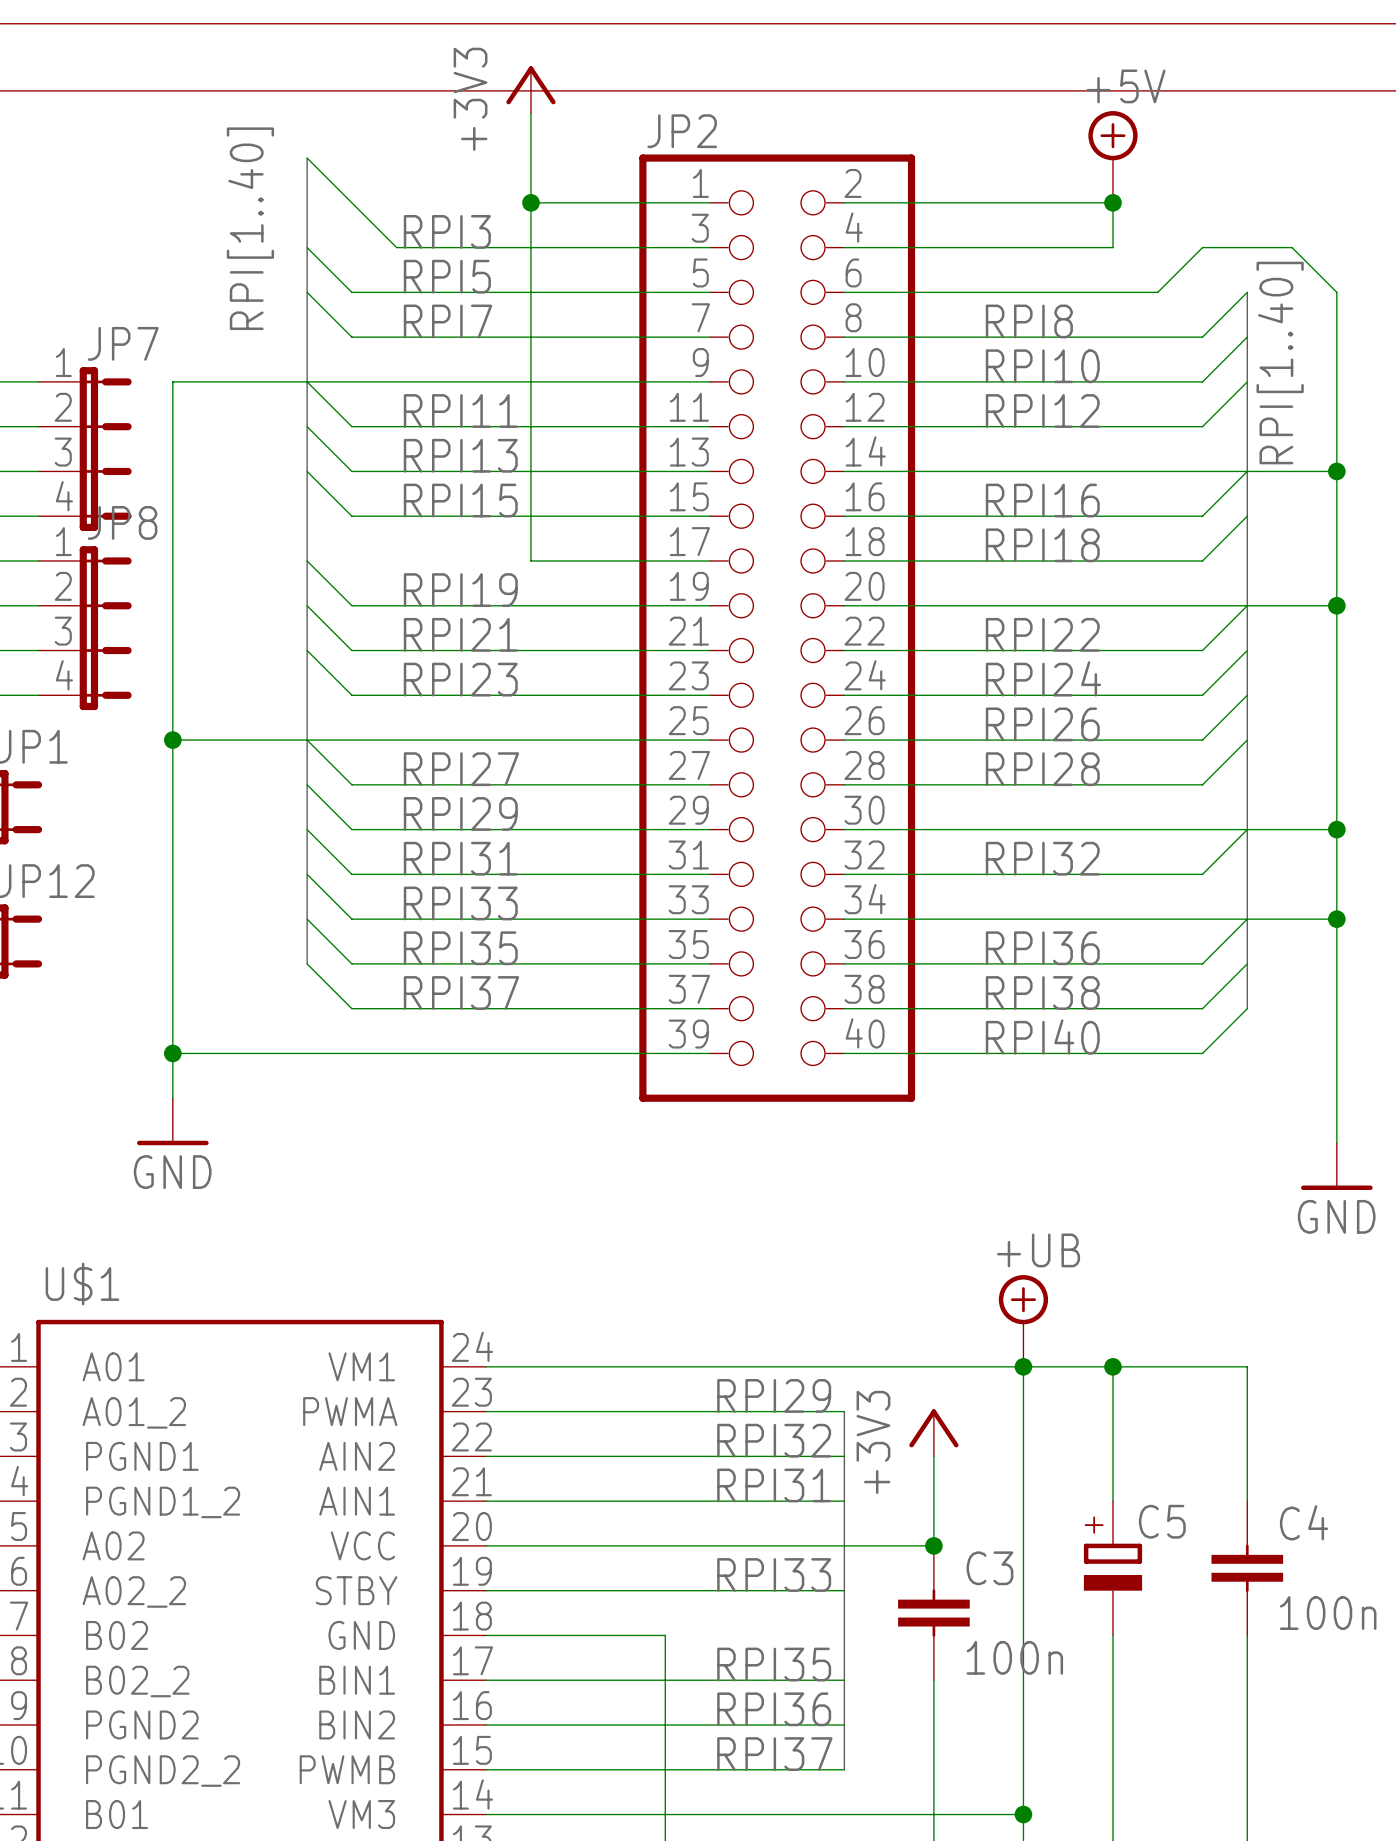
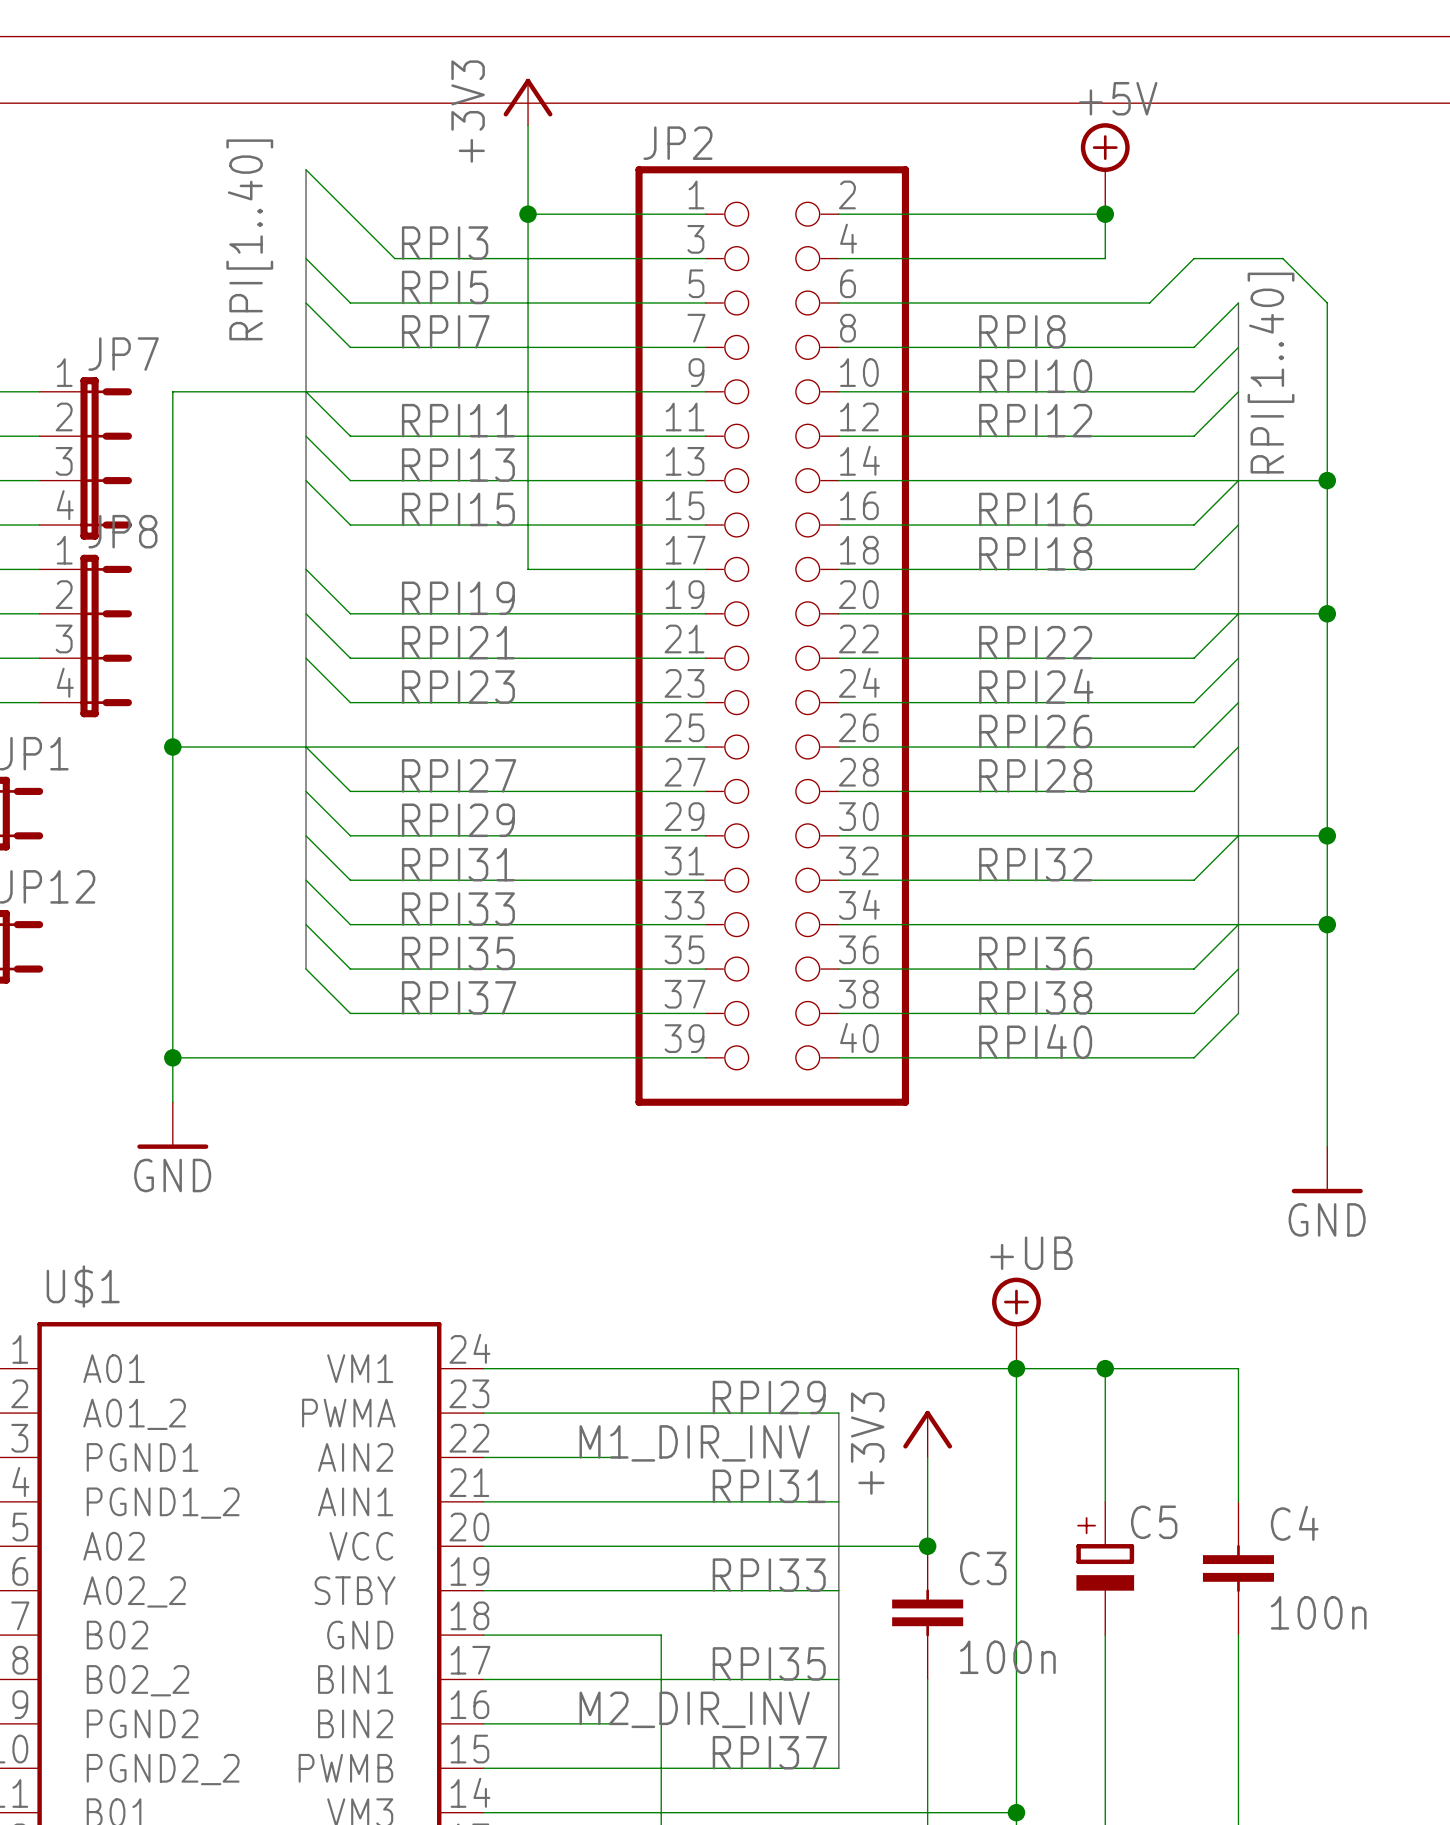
label: RPI32 (774, 1440) -> none
label: none -> M1_DIR_INV (694, 1443)
wire: (620, 1456) (844, 1456) -> none
label: RPI36 (774, 1709) -> none
label: none -> M2_DIR_INV (694, 1709)
wire: (620, 1724) (844, 1724) -> none

